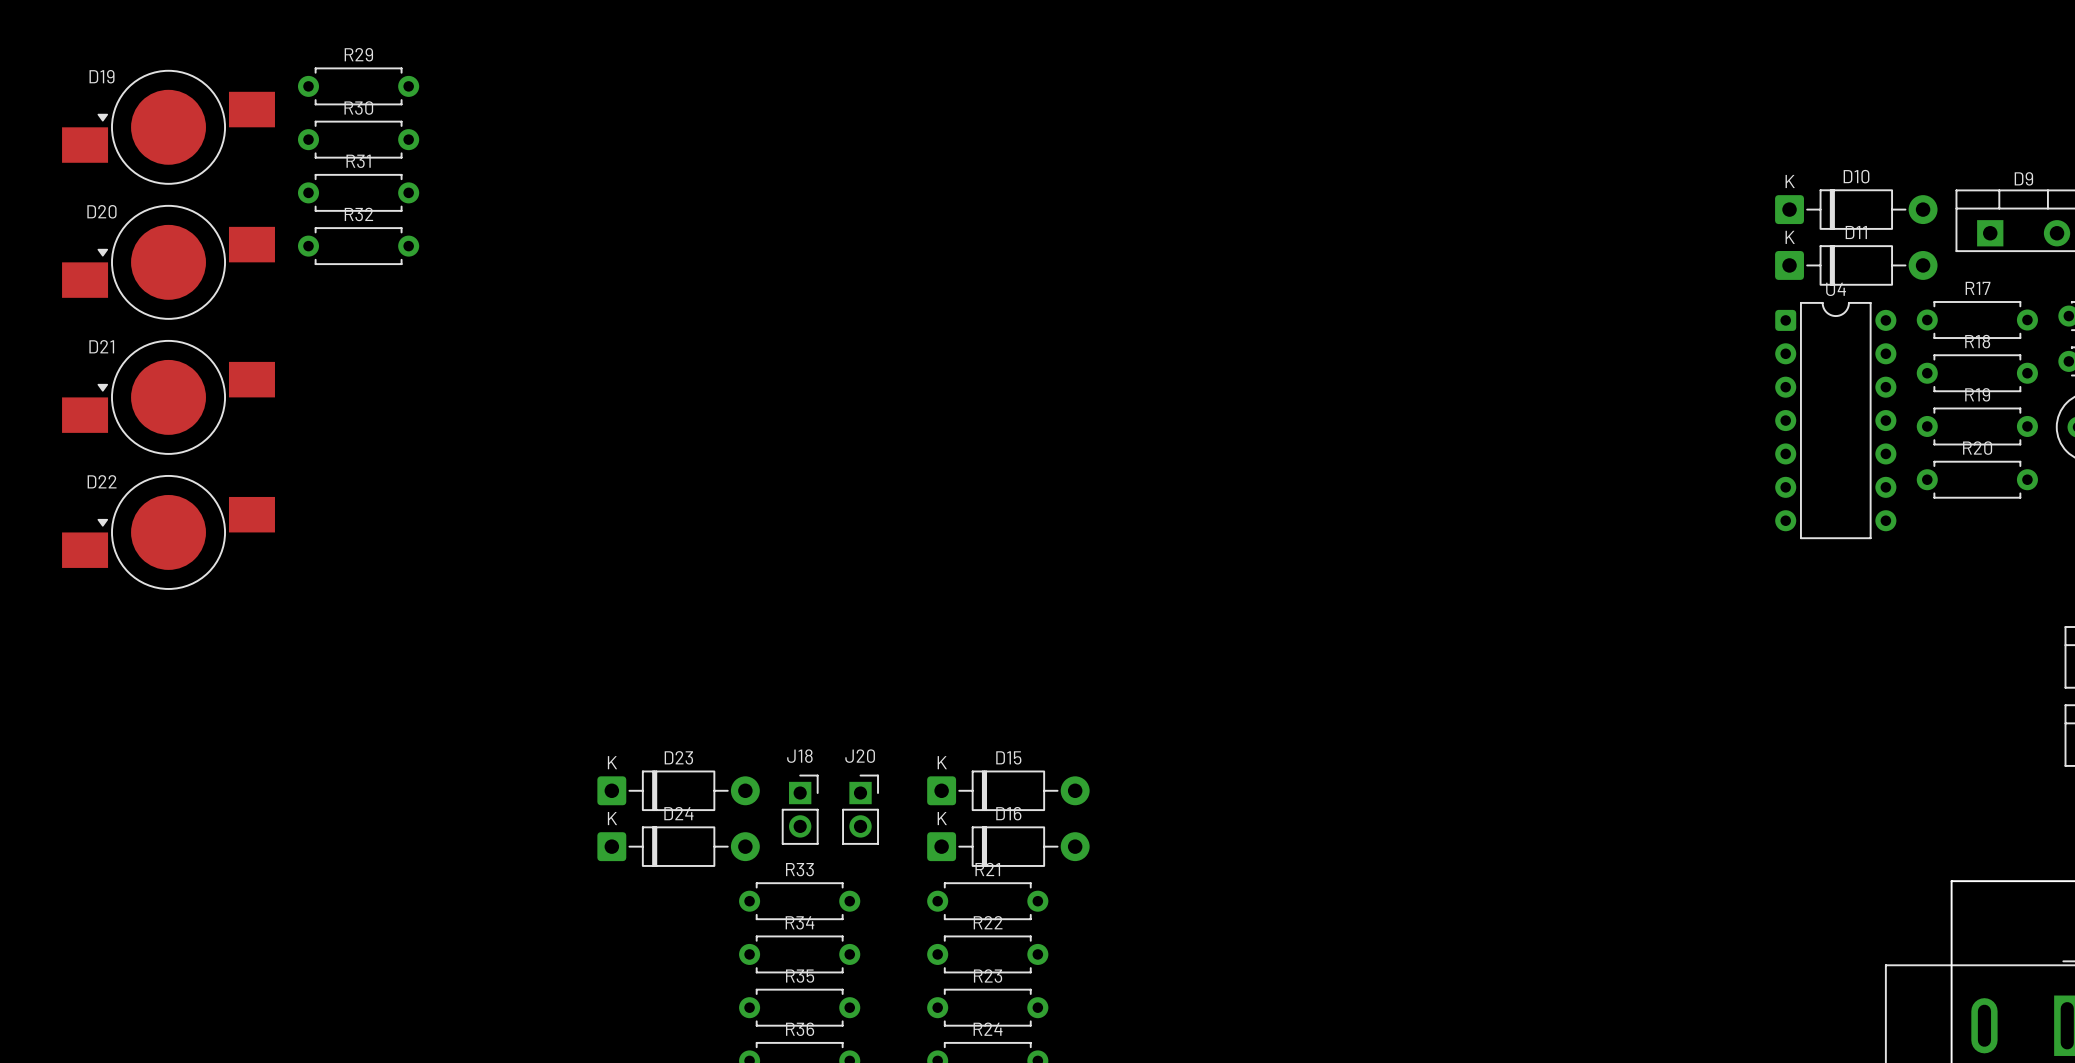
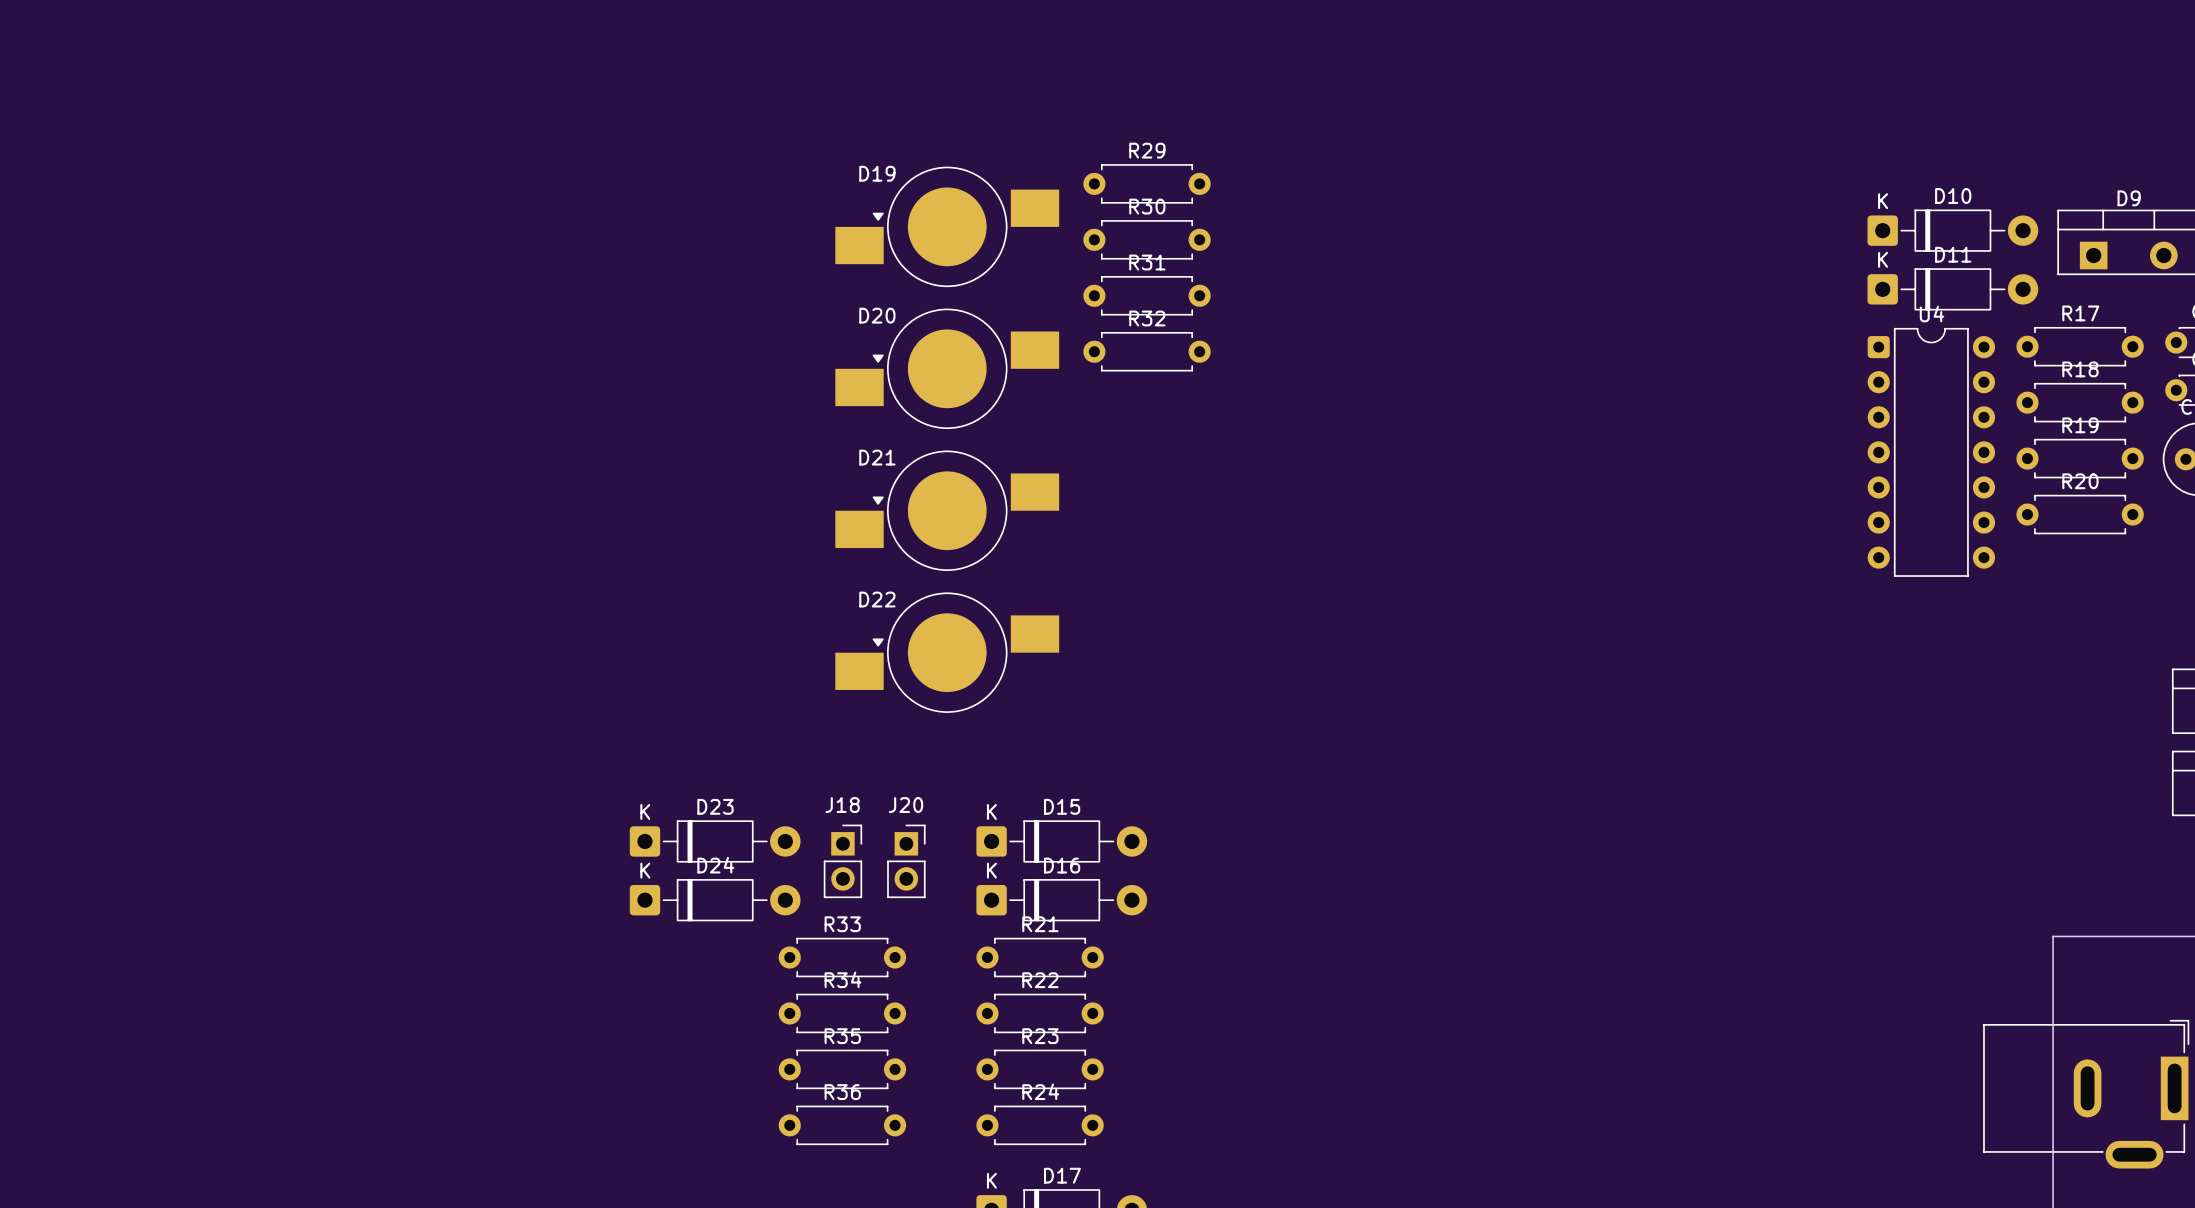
R29 position: (358, 86) -> (1147, 183)
D19 position: (168, 127) -> (947, 226)
R30 position: (358, 139) -> (1147, 239)
R31 position: (358, 192) -> (1147, 295)
R32 position: (358, 246) -> (1147, 351)
D20 position: (168, 262) -> (947, 368)
D21 position: (168, 397) -> (947, 510)
D22 position: (168, 532) -> (947, 652)

